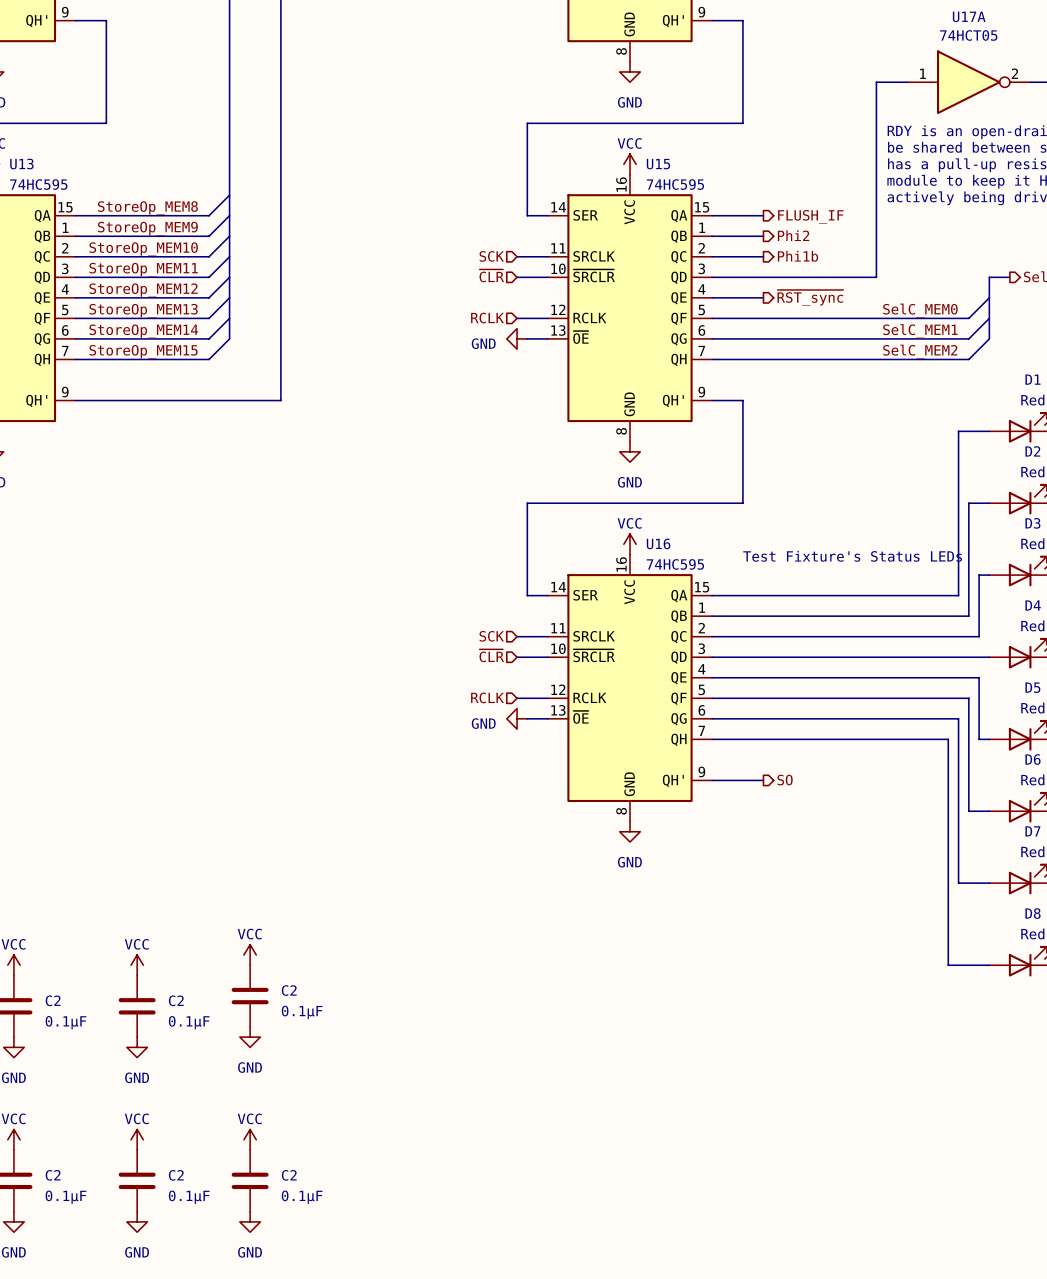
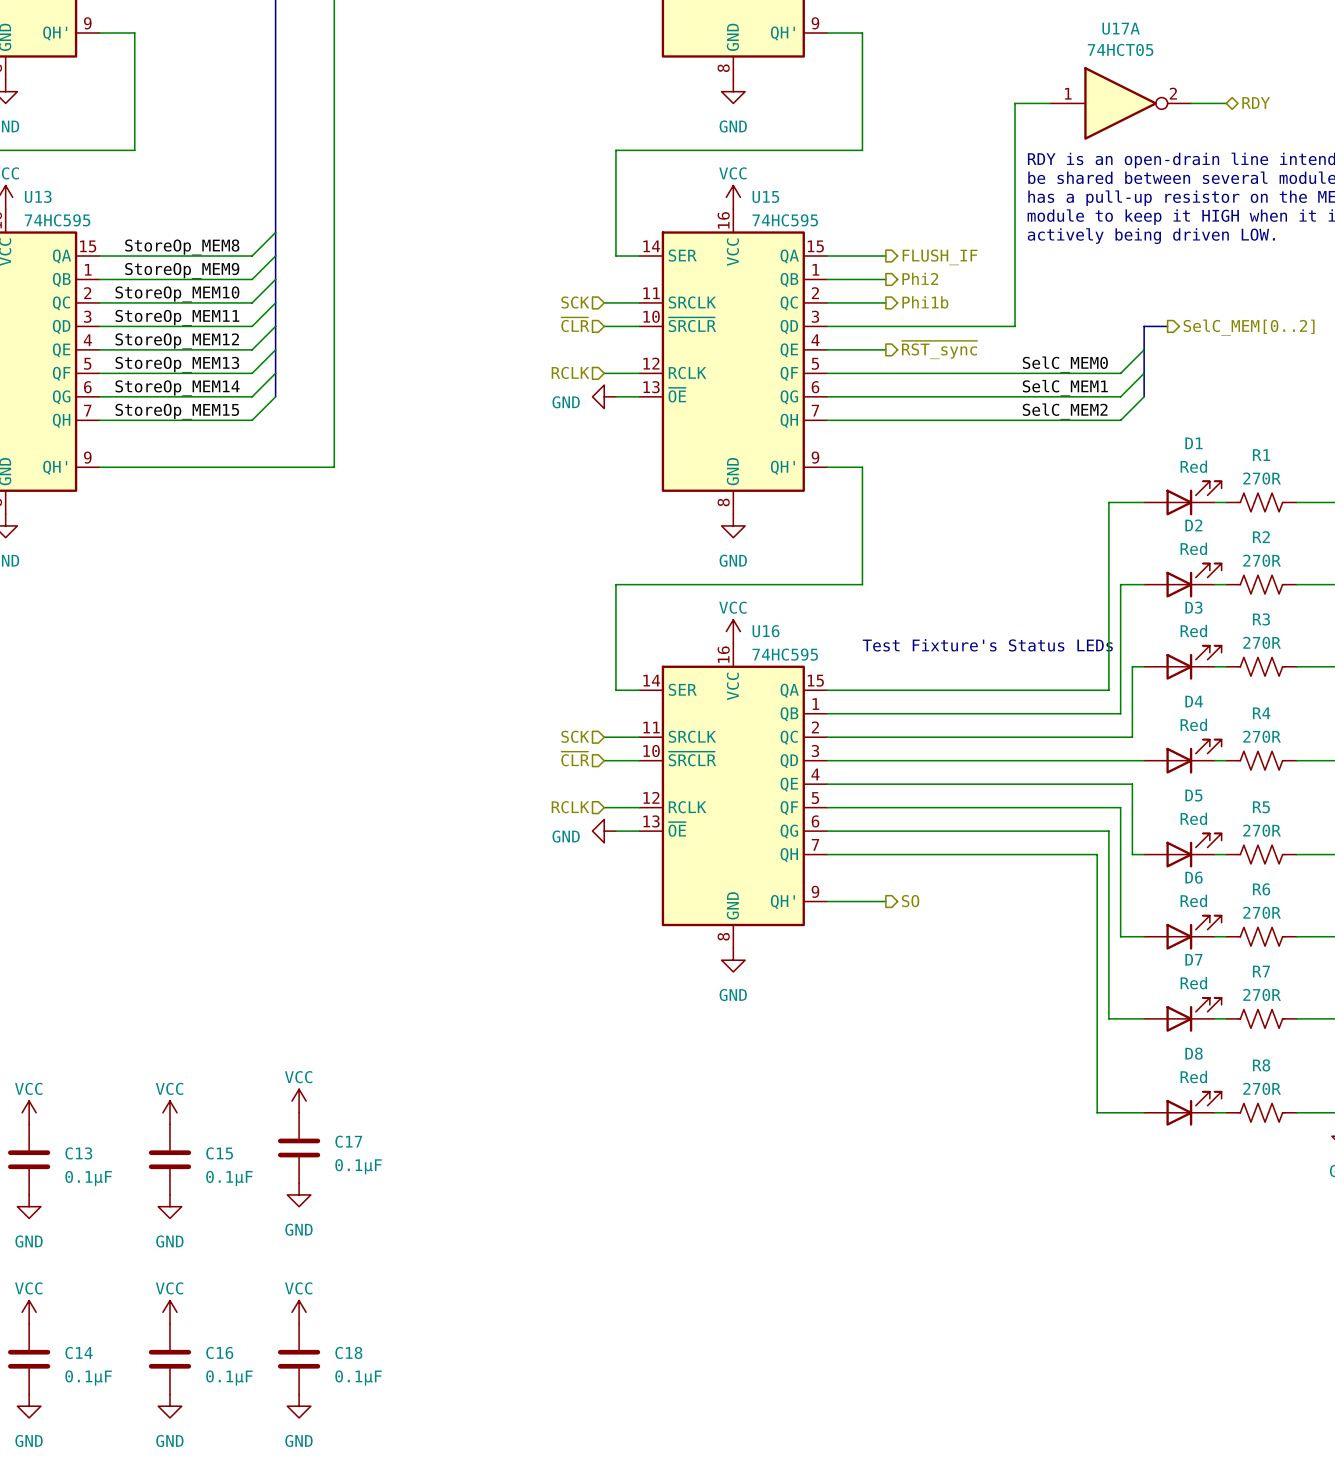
C2 name: C2 (289, 990) -> C17 (348, 1141)
C2 name: C2 (53, 1000) -> C13 (78, 1153)
C2 name: C2 (176, 1000) -> C15 (219, 1153)
C2 name: C2 (53, 1175) -> C14 (79, 1352)
C2 name: C2 (176, 1175) -> C16 (219, 1352)
C2 name: C2 (289, 1175) -> C18 (348, 1352)

